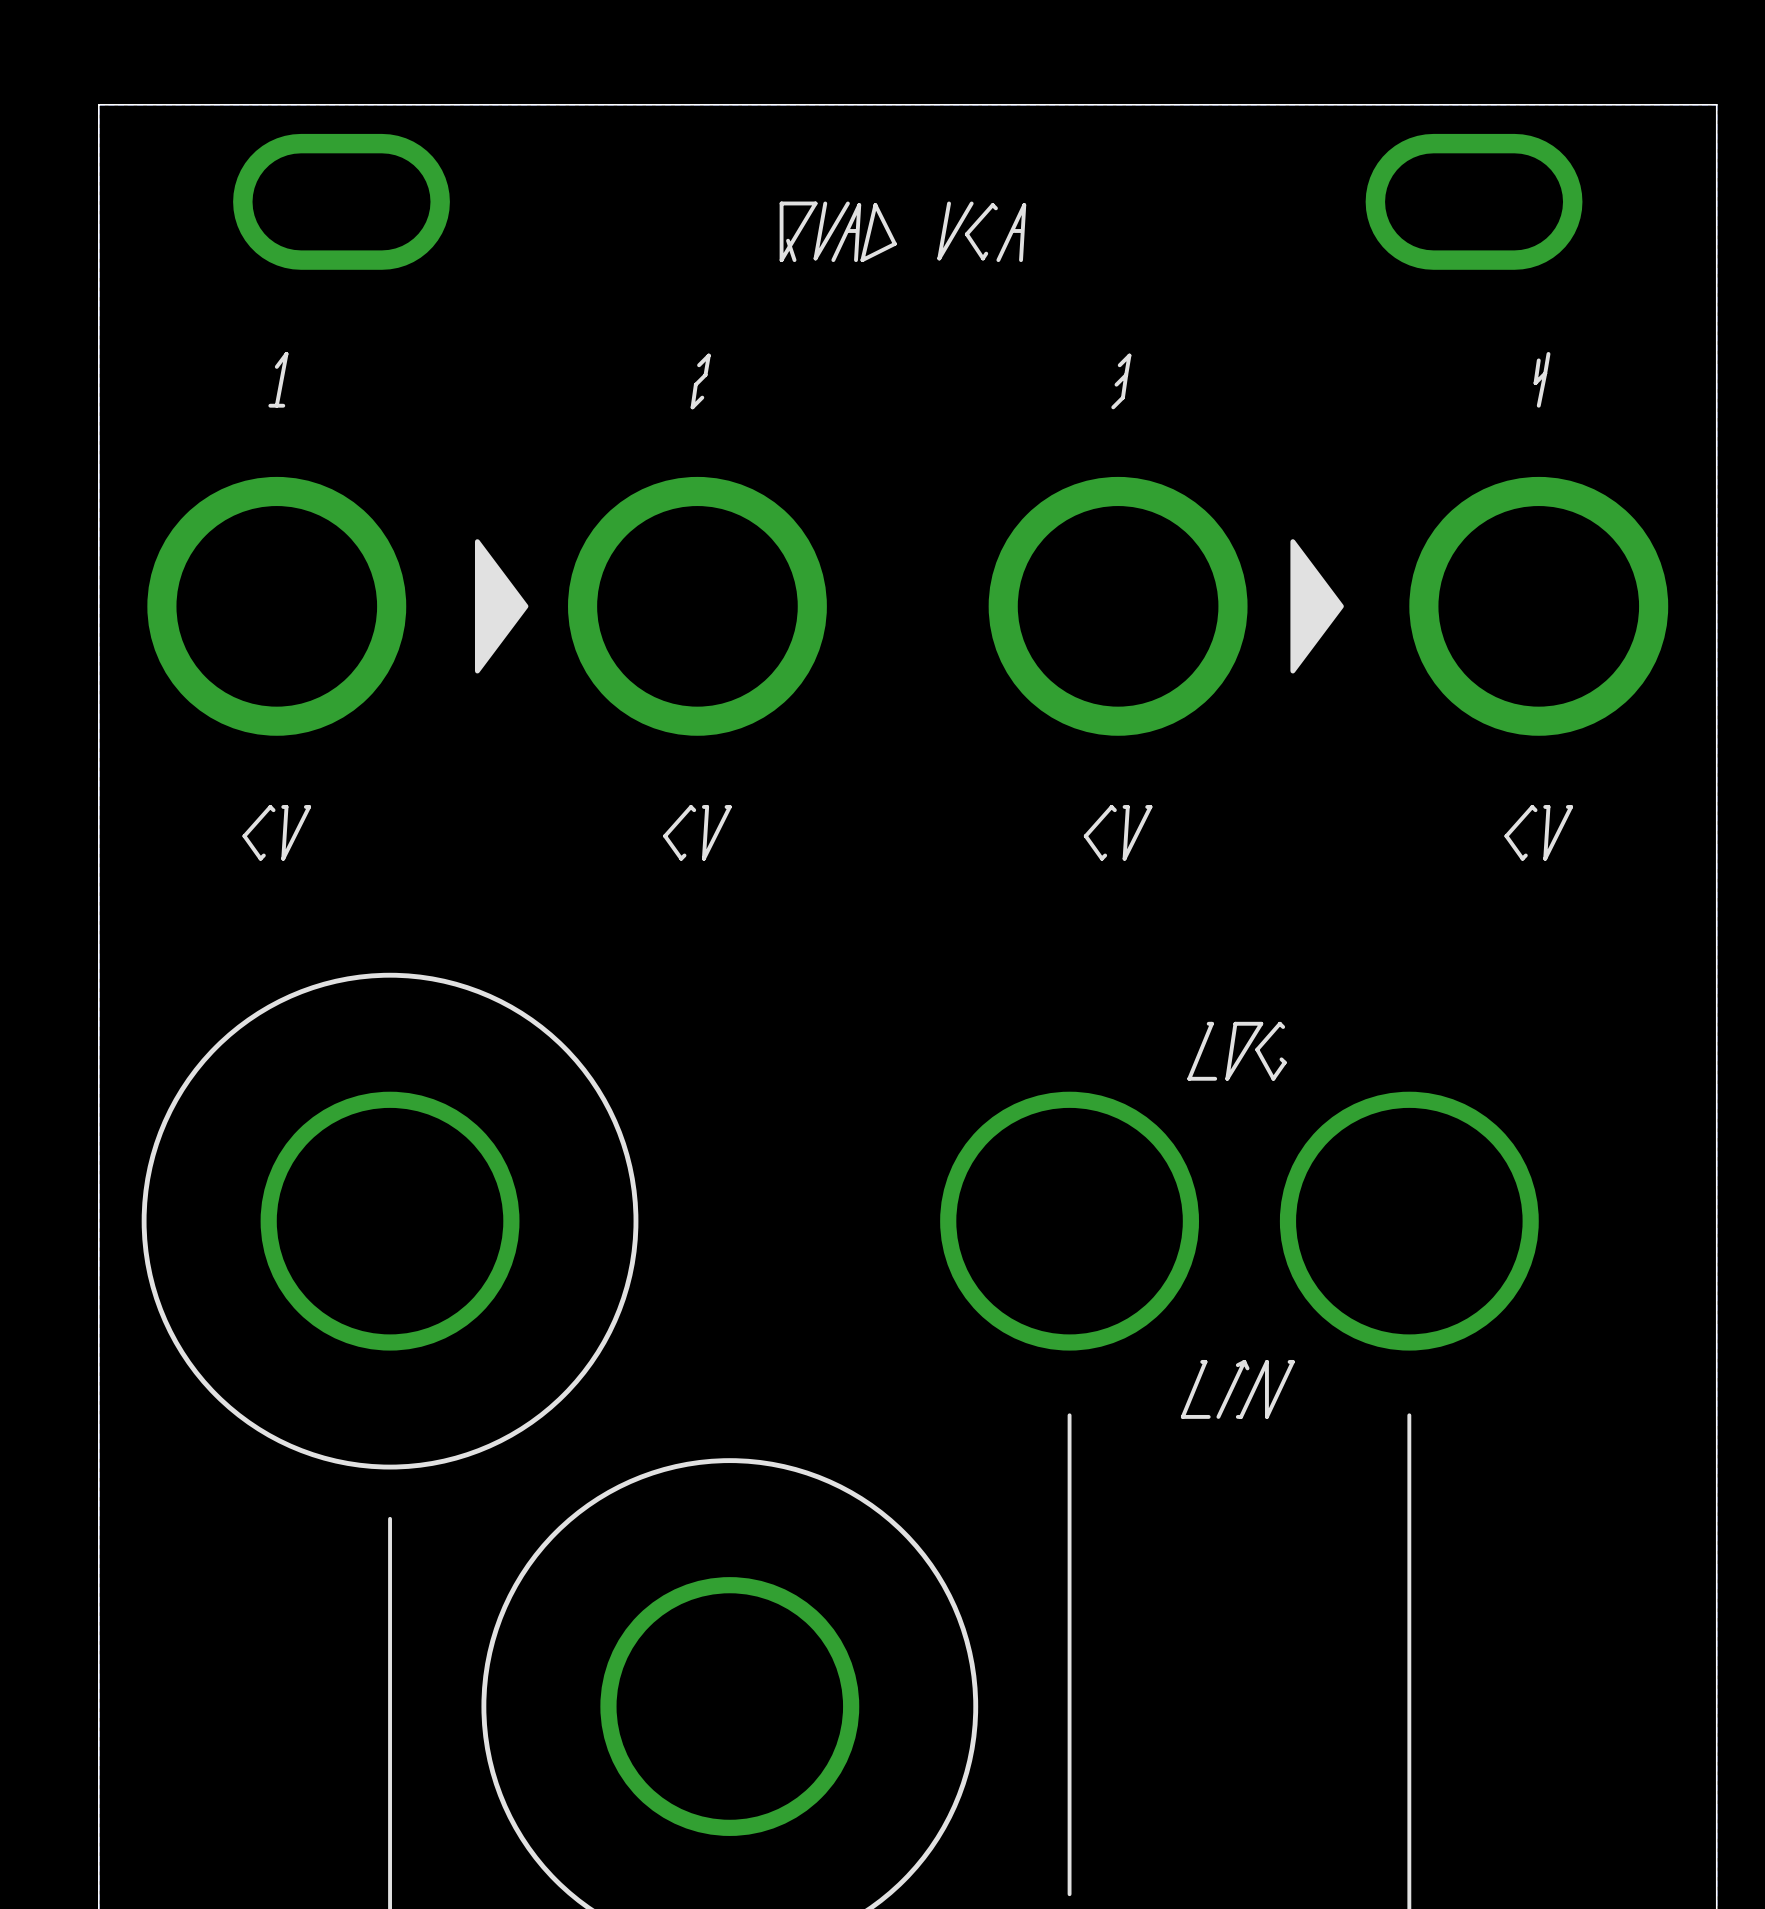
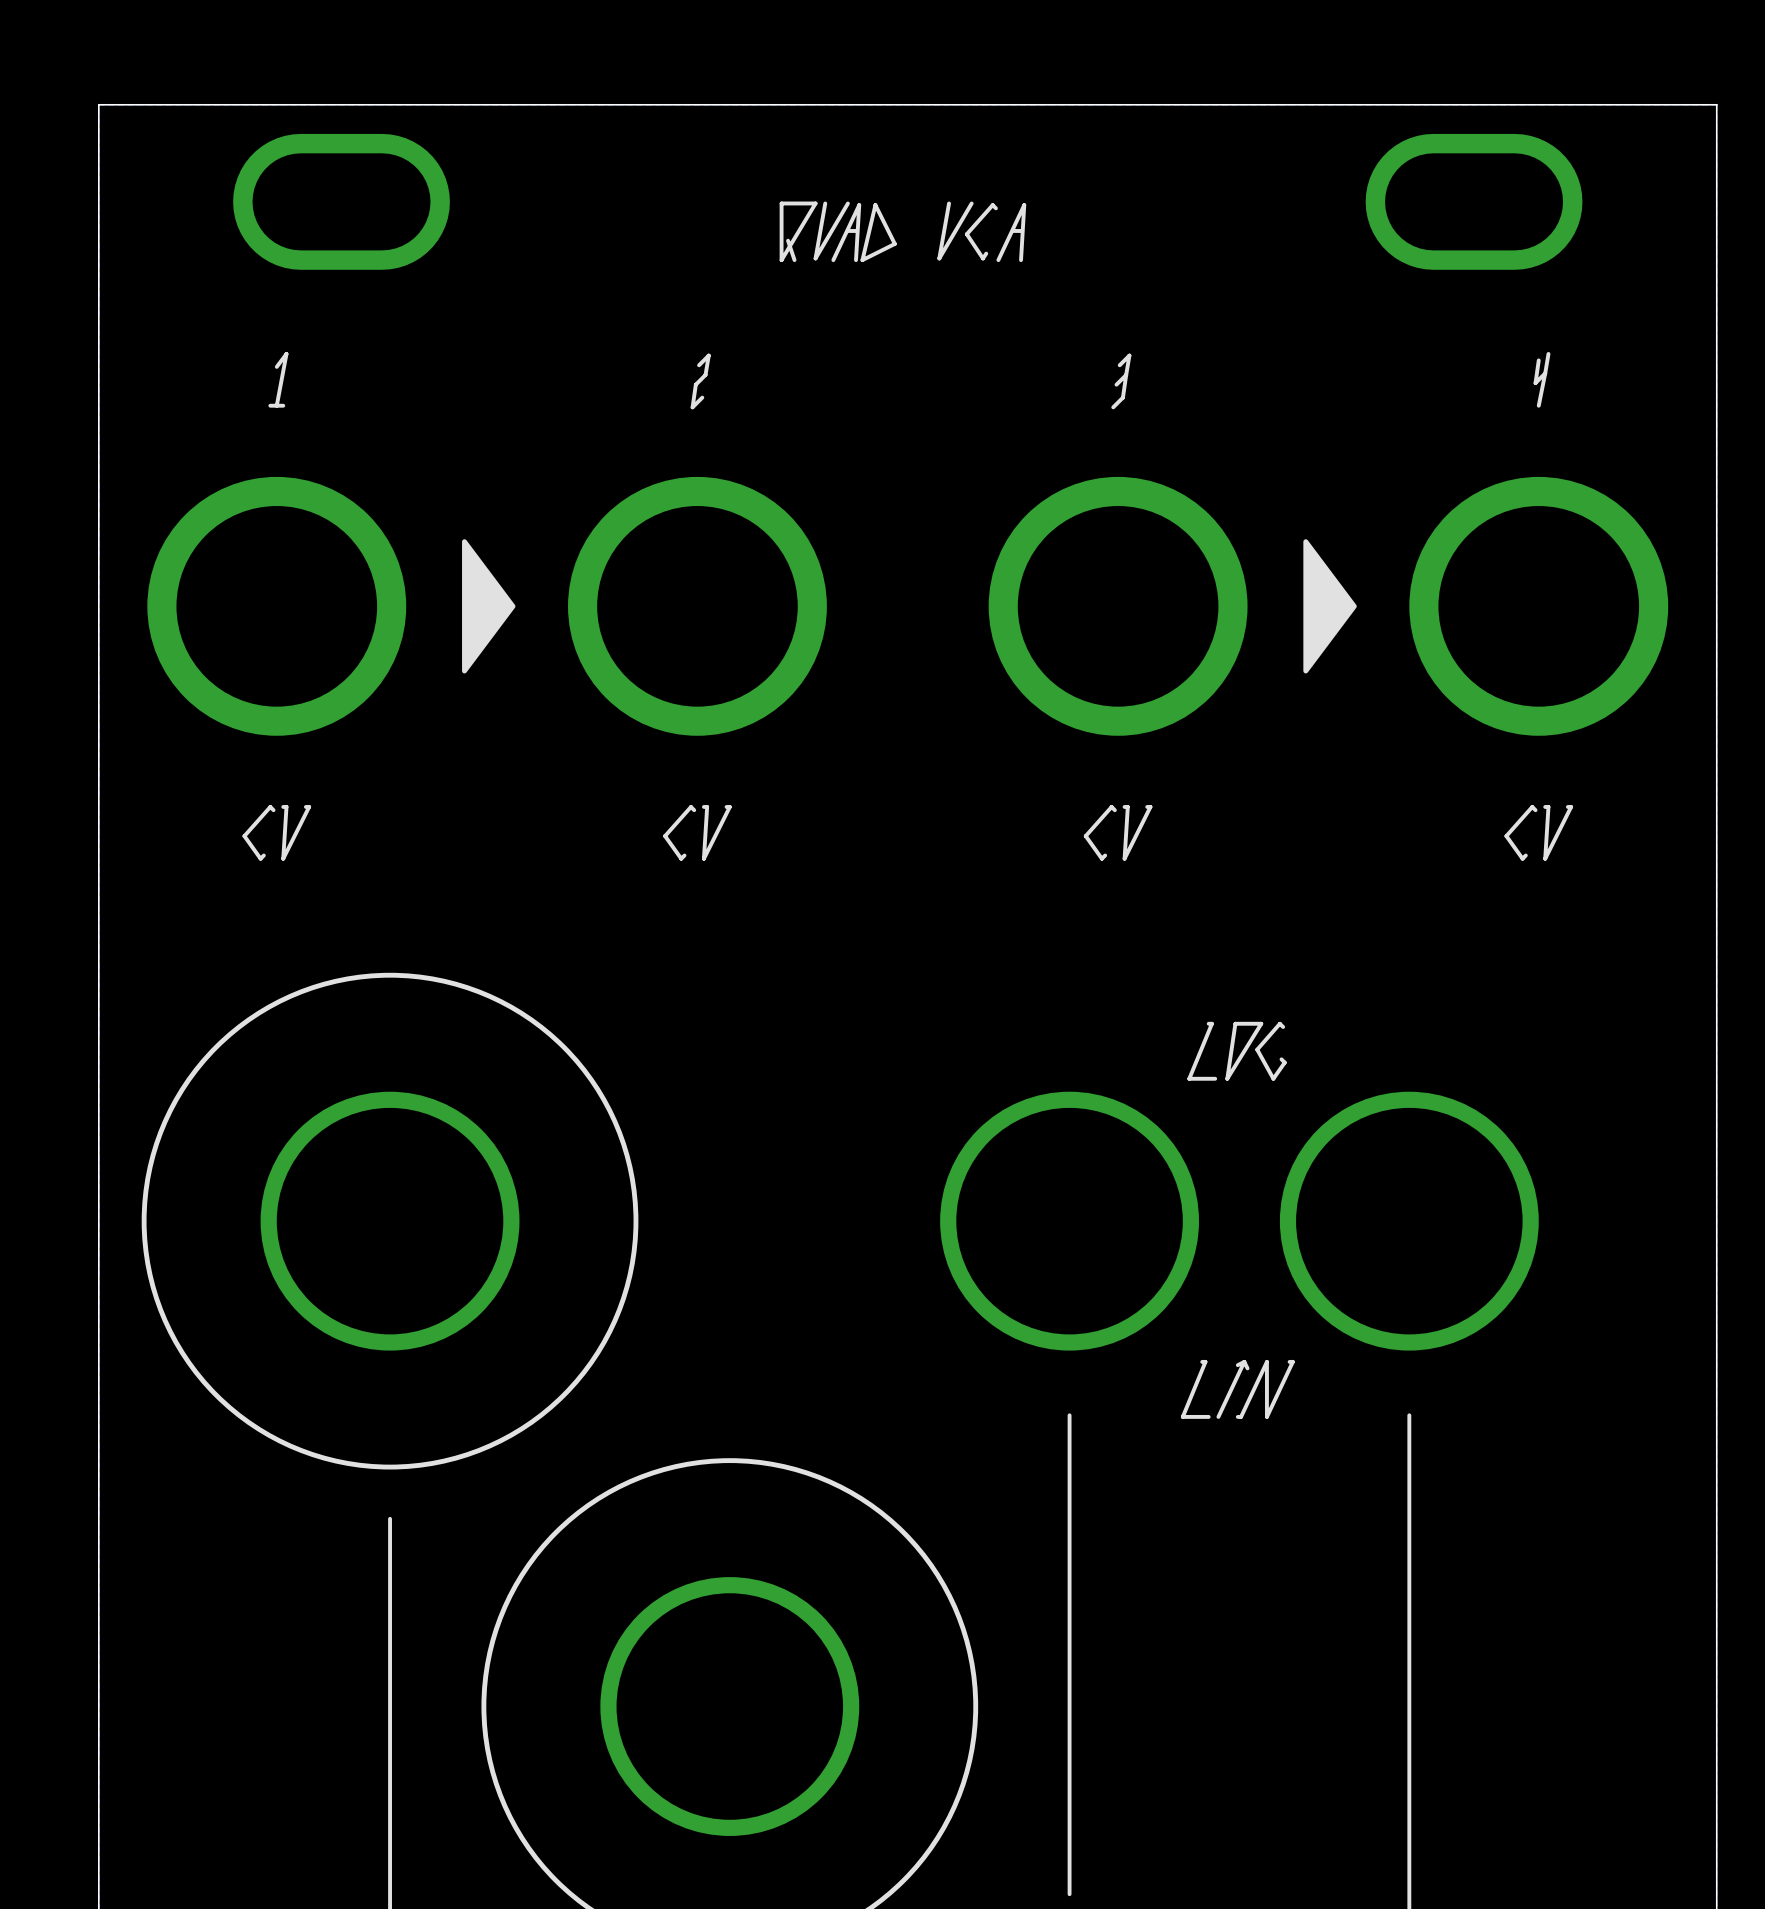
drawing position: (501, 606) -> (488, 606)
drawing position: (1317, 606) -> (1330, 606)

